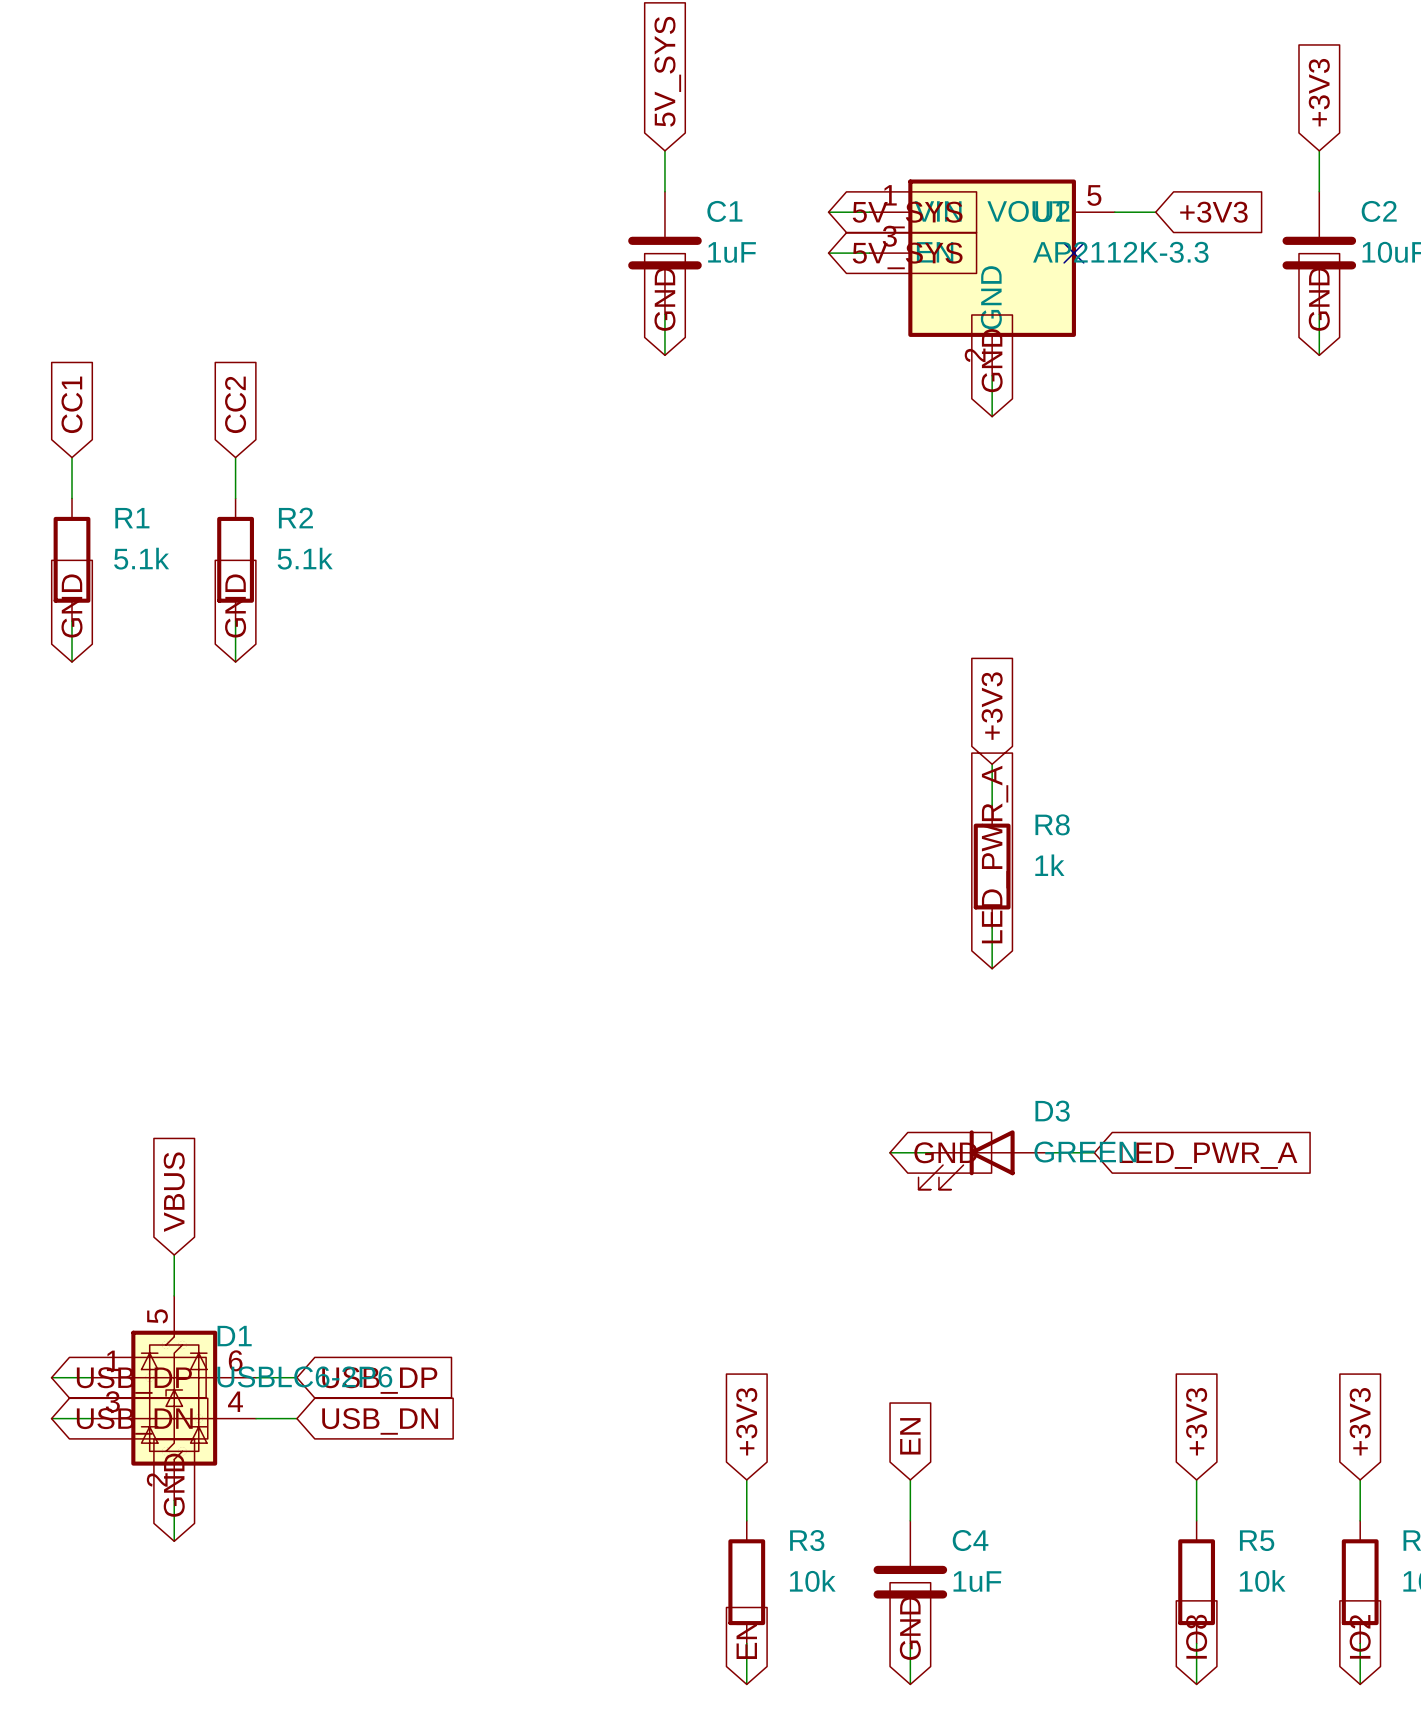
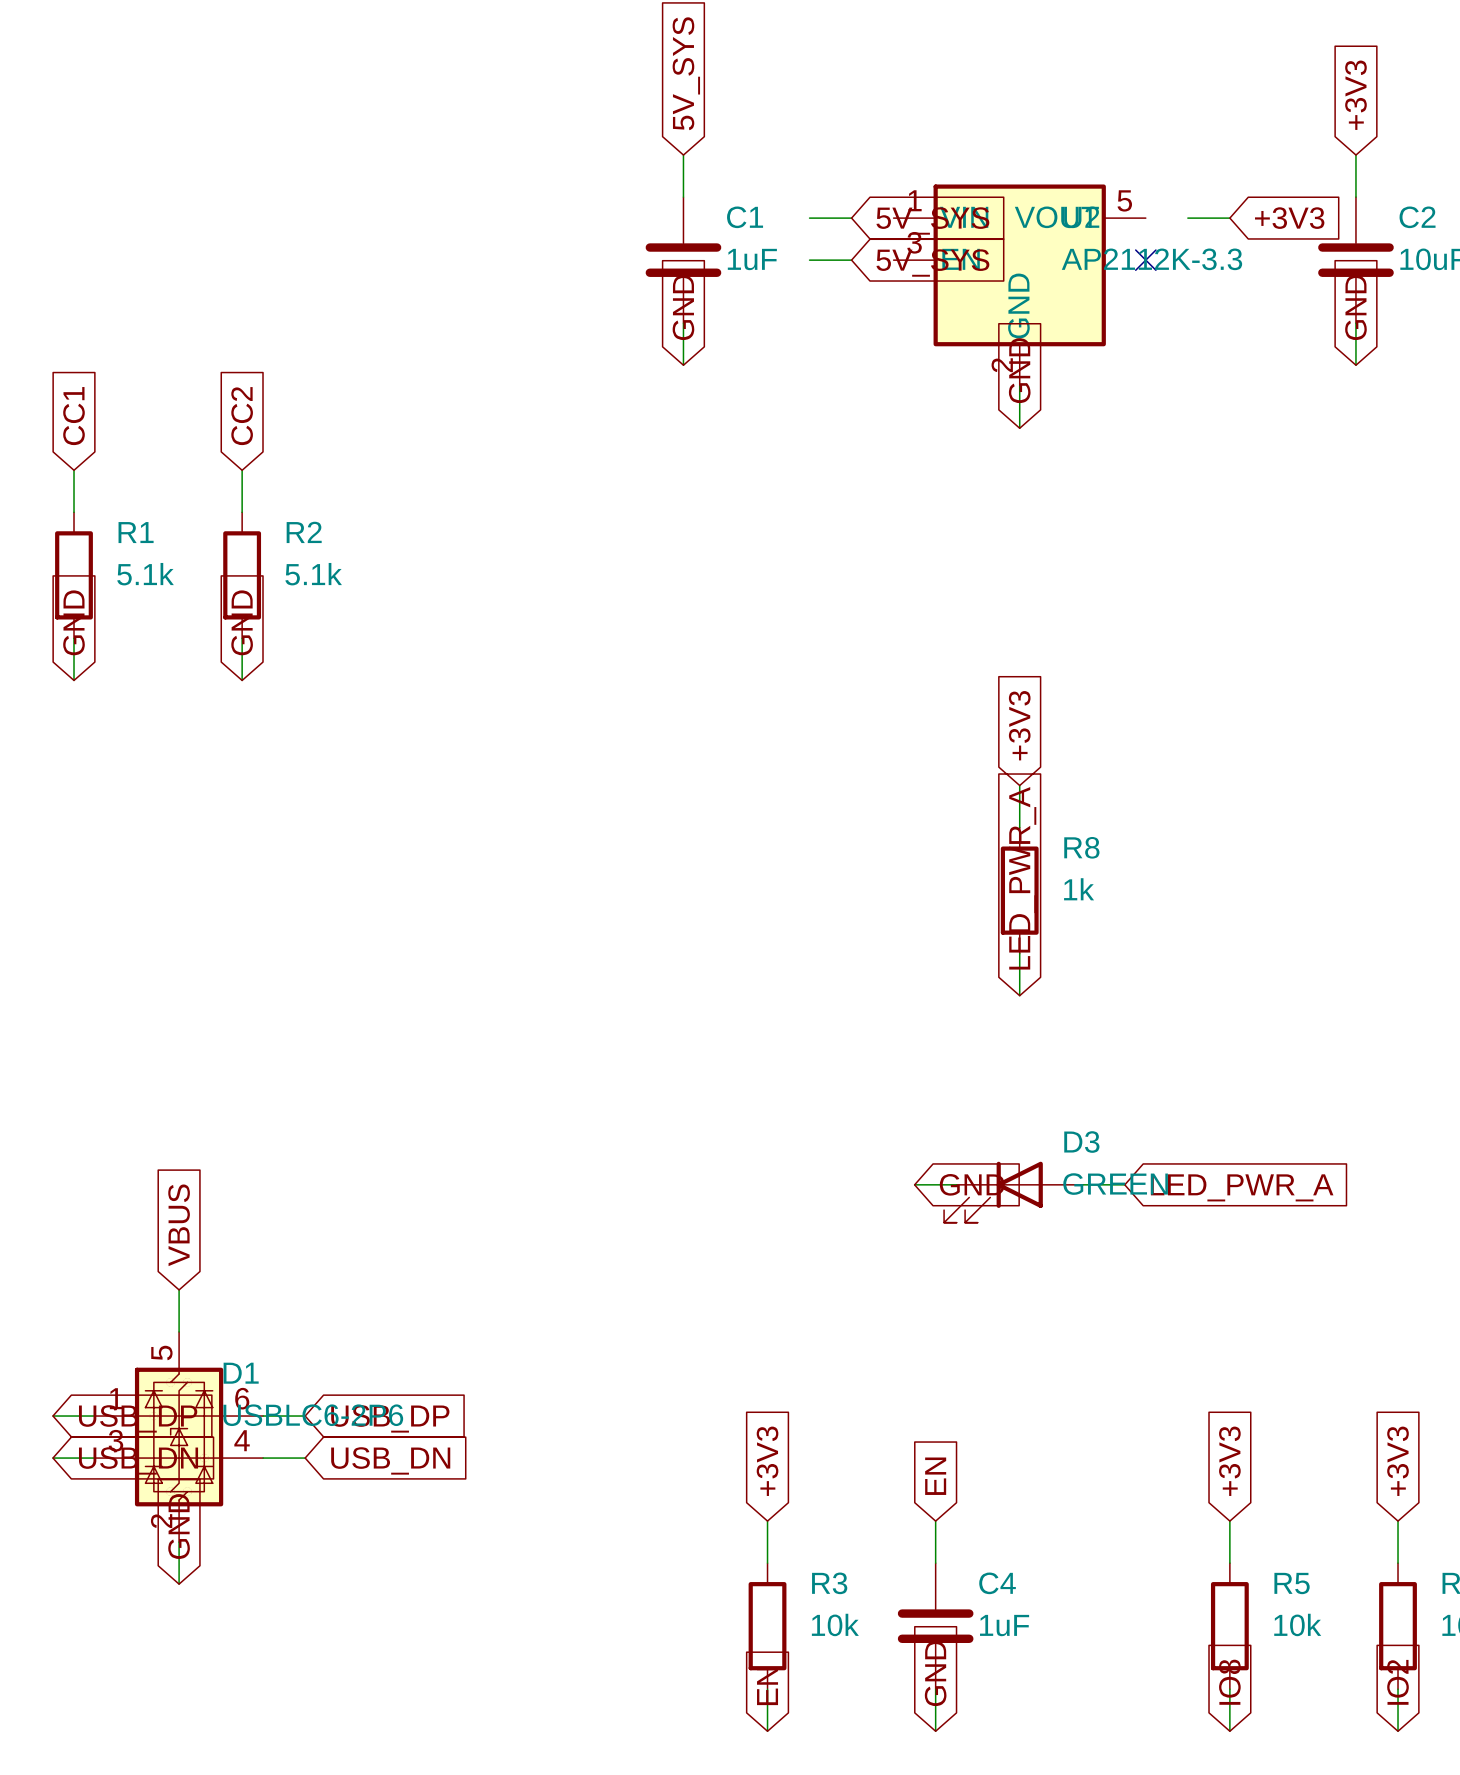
wire: (828, 212) (869, 212) -> (851, 218) (809, 218)
wire: (1114, 212) (1155, 212) -> (1229, 218) (1187, 218)
global label position: +3V3 (1213, 212) -> +3V3 (1289, 218)
wire: (828, 253) (869, 253) -> (851, 260) (809, 260)
no-connect mark position: (1073, 253) -> (1145, 260)

